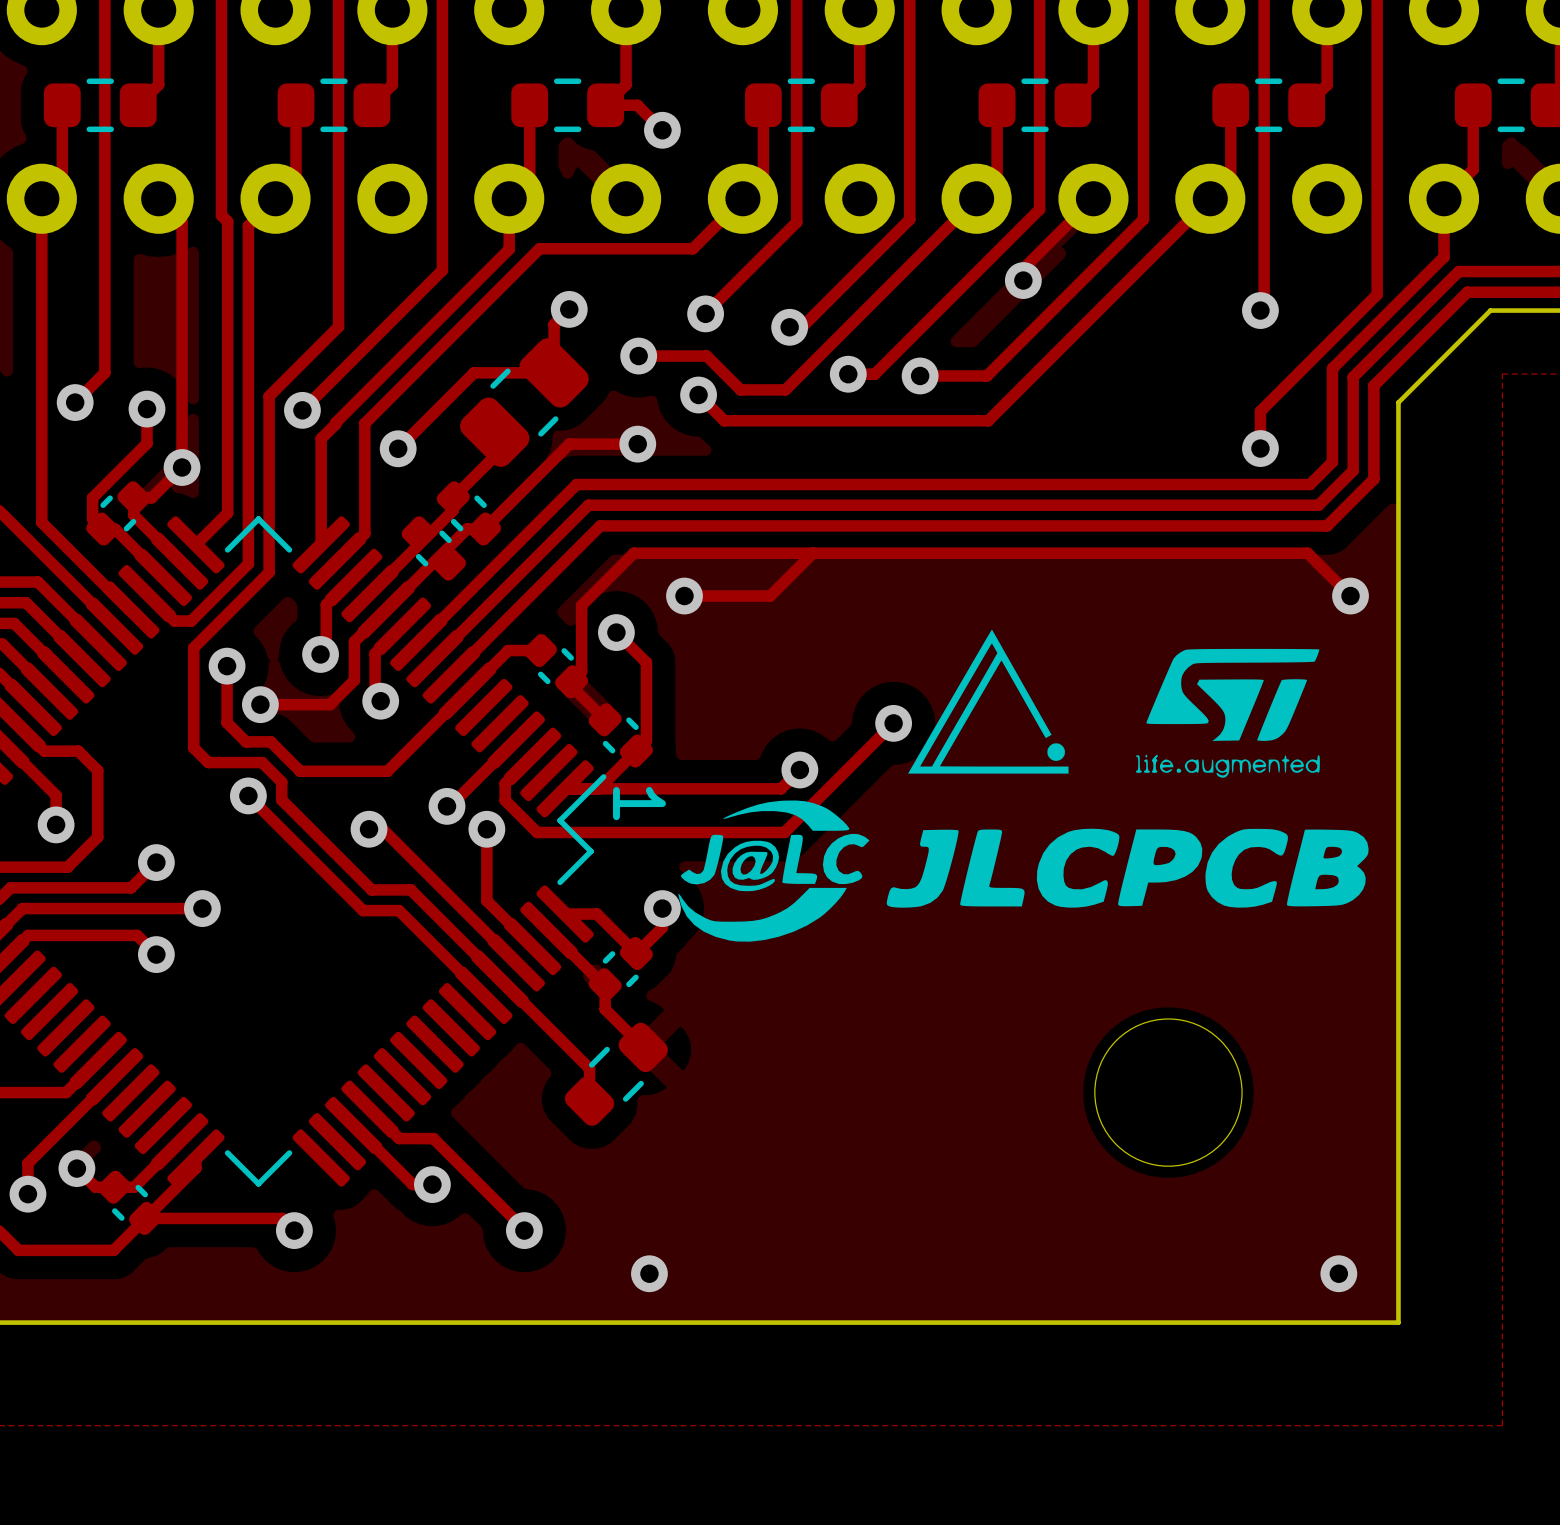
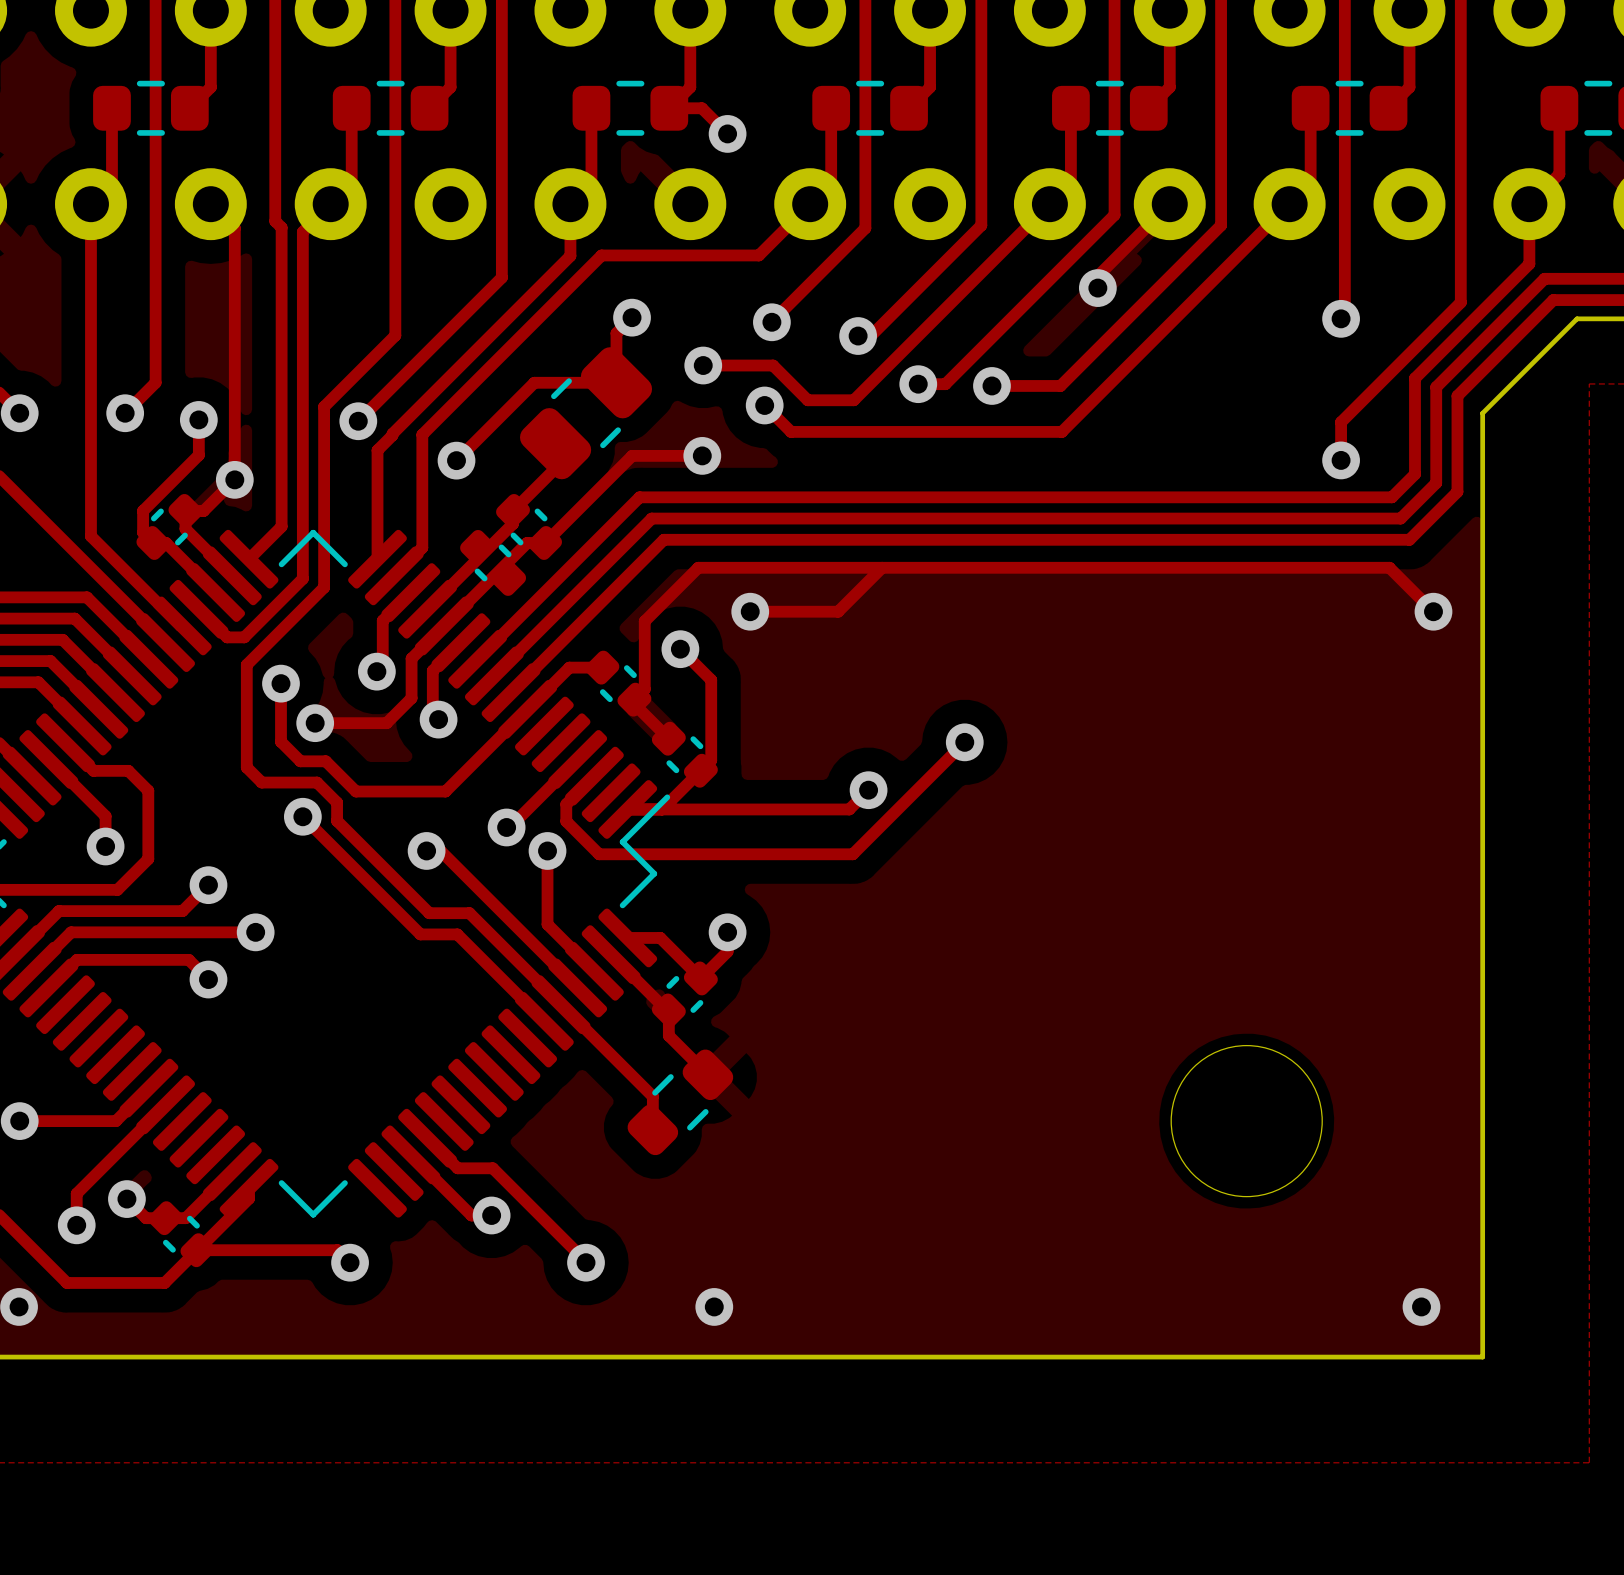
drawing: [678, 629, 1369, 942] -> none
text: 1 (639, 803) -> none

